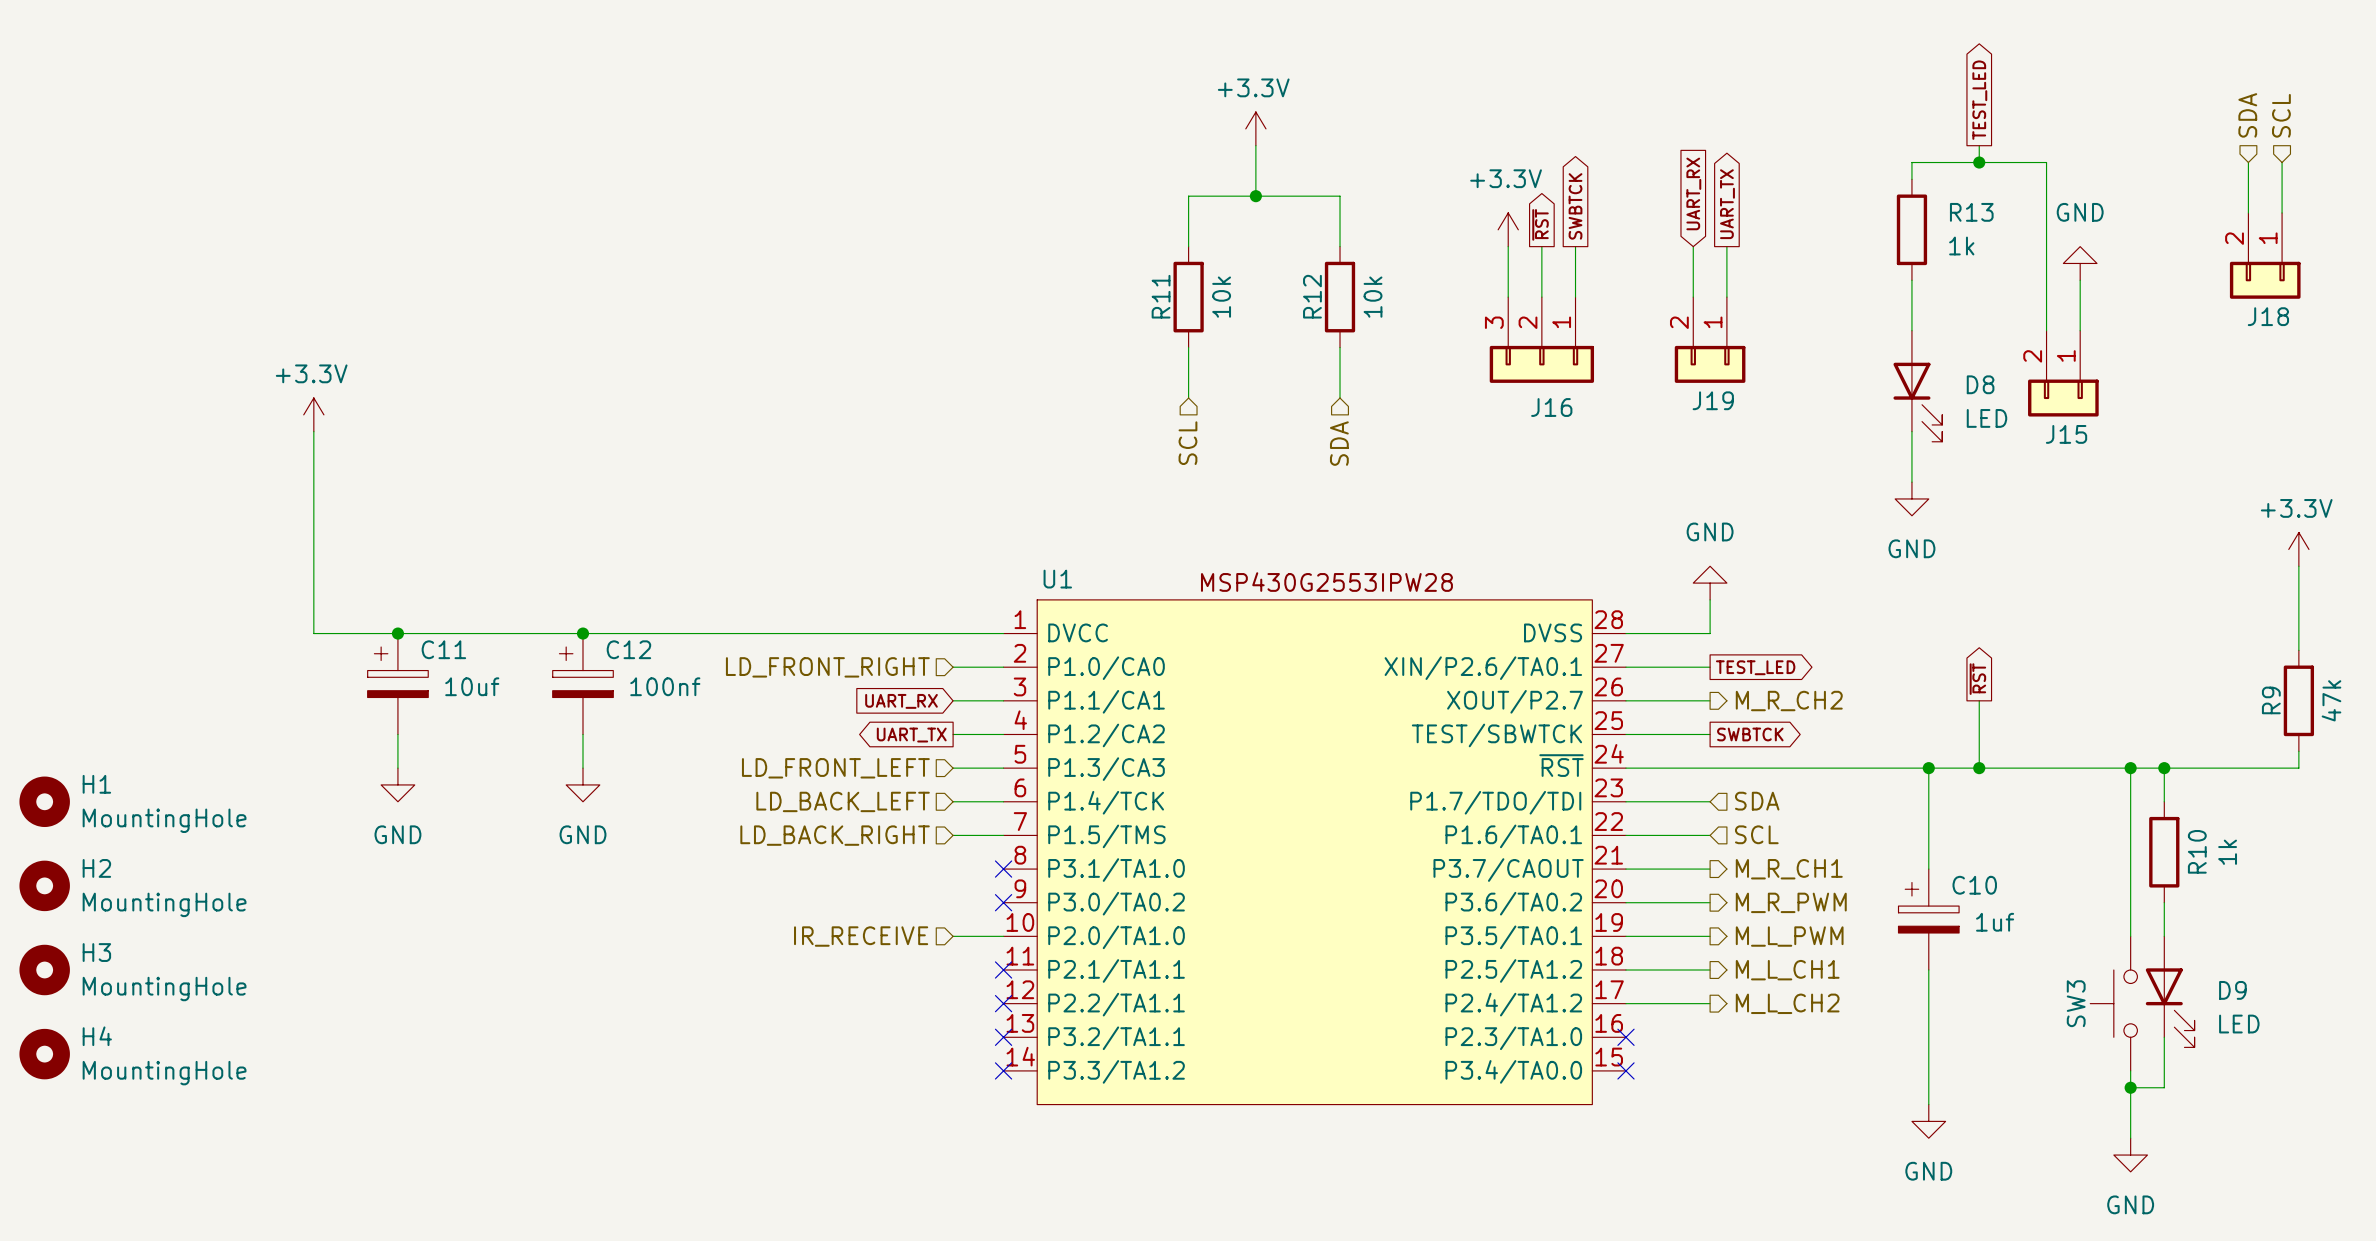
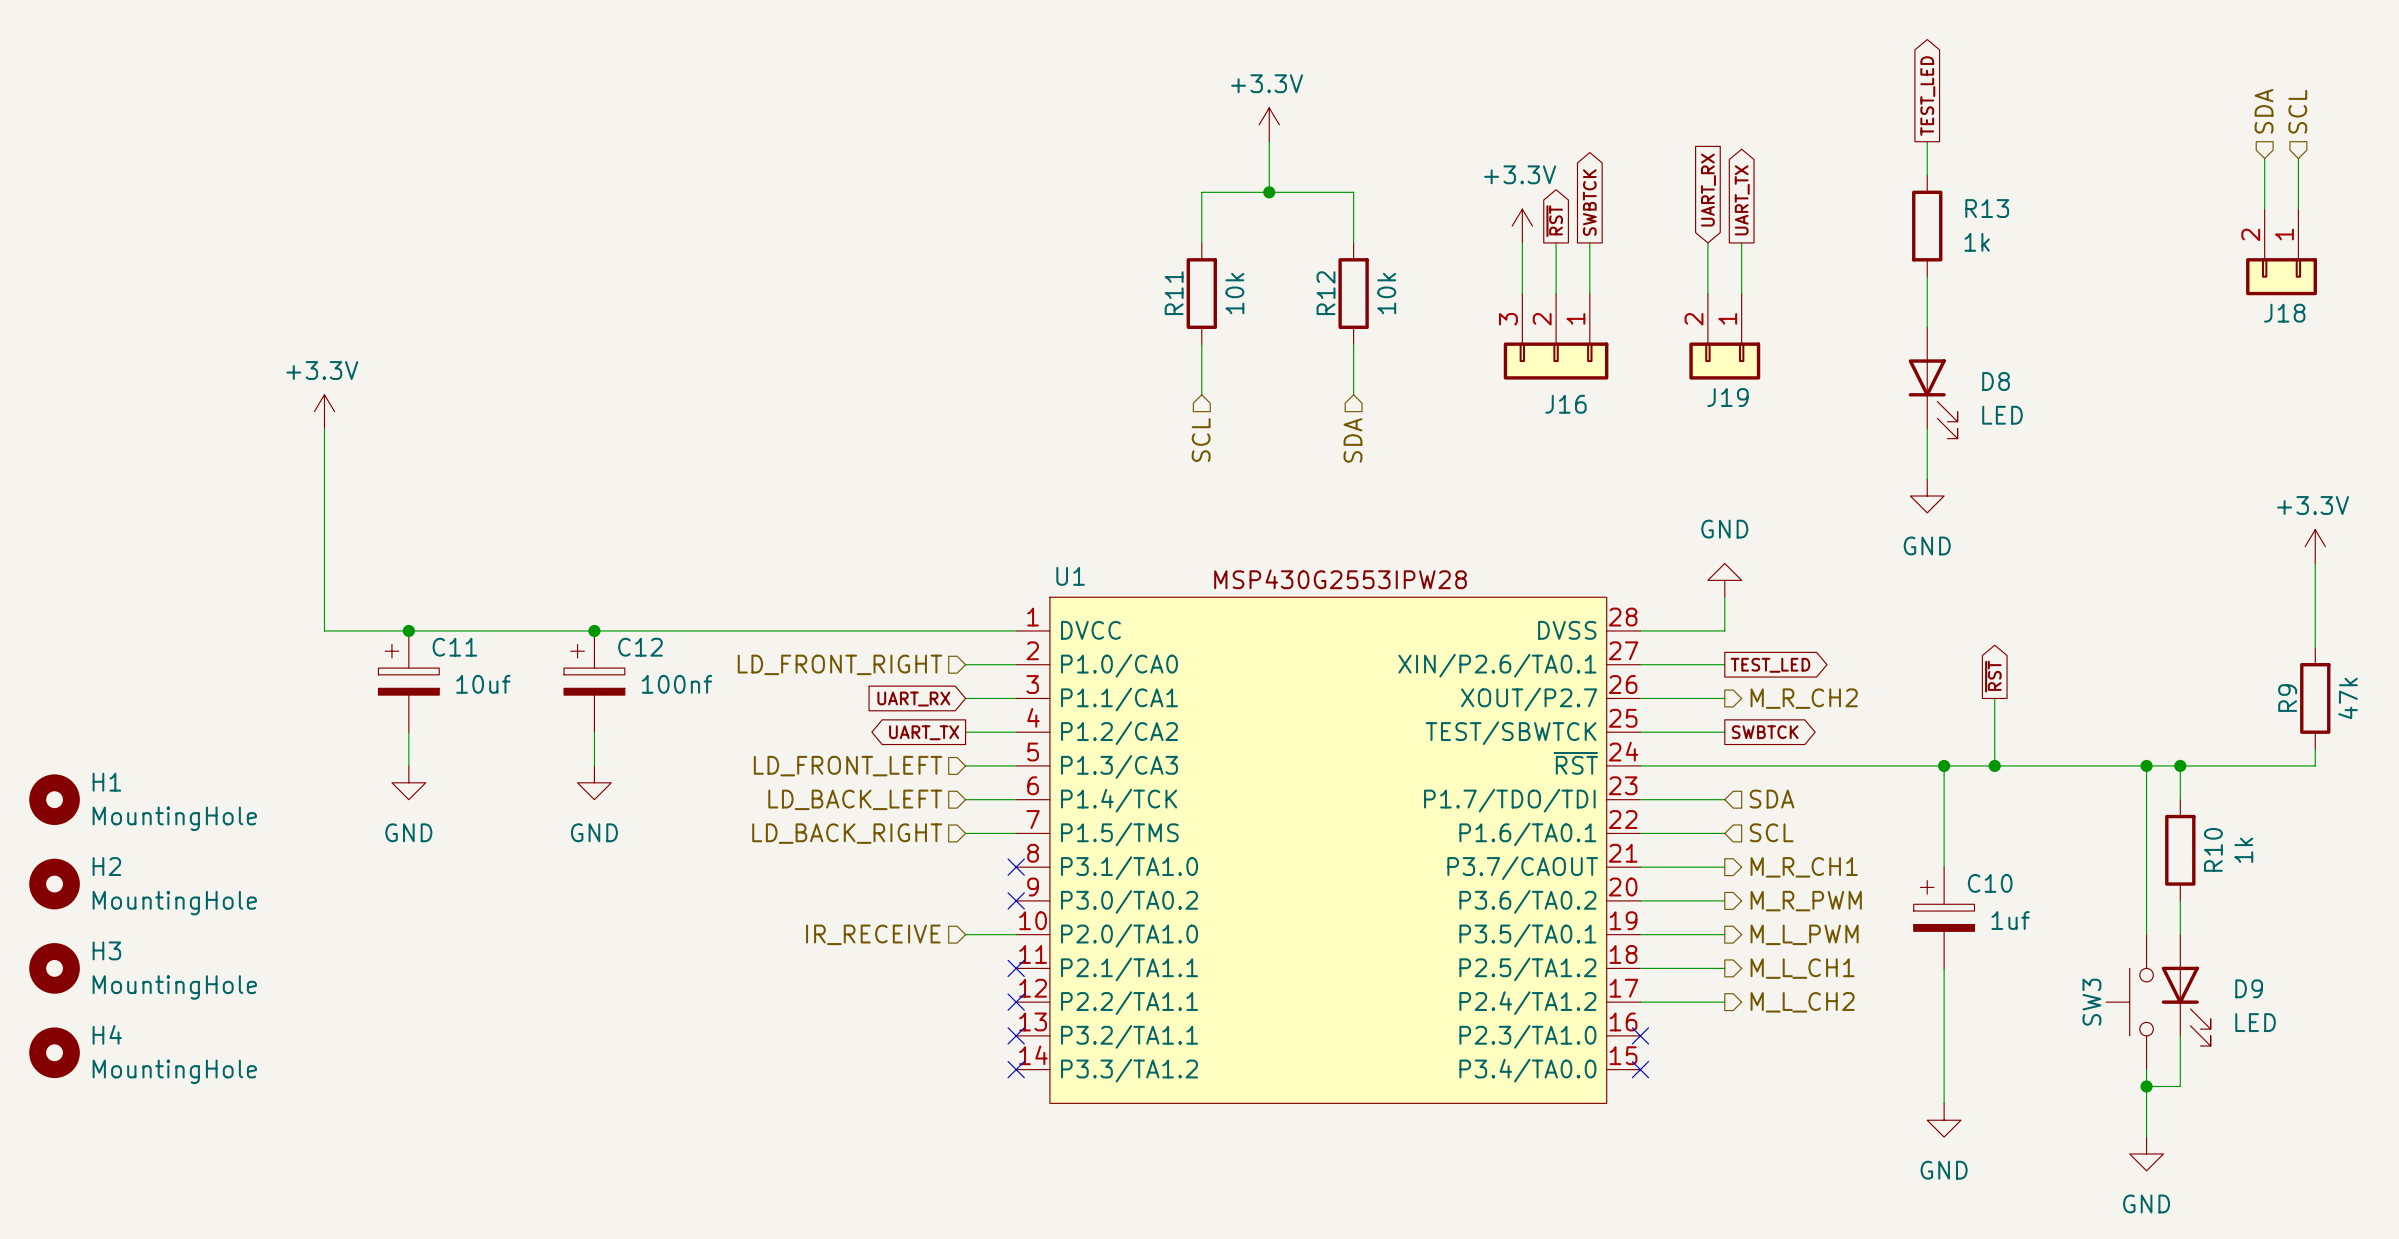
global label position: TEST_LED (1979, 100) -> TEST_LED (1927, 96)
wire: (1979, 145) (1979, 162) -> none
wire: (1911, 162) (2046, 162) (2046, 330) -> (1927, 158) (1927, 141)
junction: (1979, 162) -> none
power symbol: GND (2080, 263) -> none
wire: (2080, 280) (2080, 330) -> none
J15: (2063, 373) -> none

